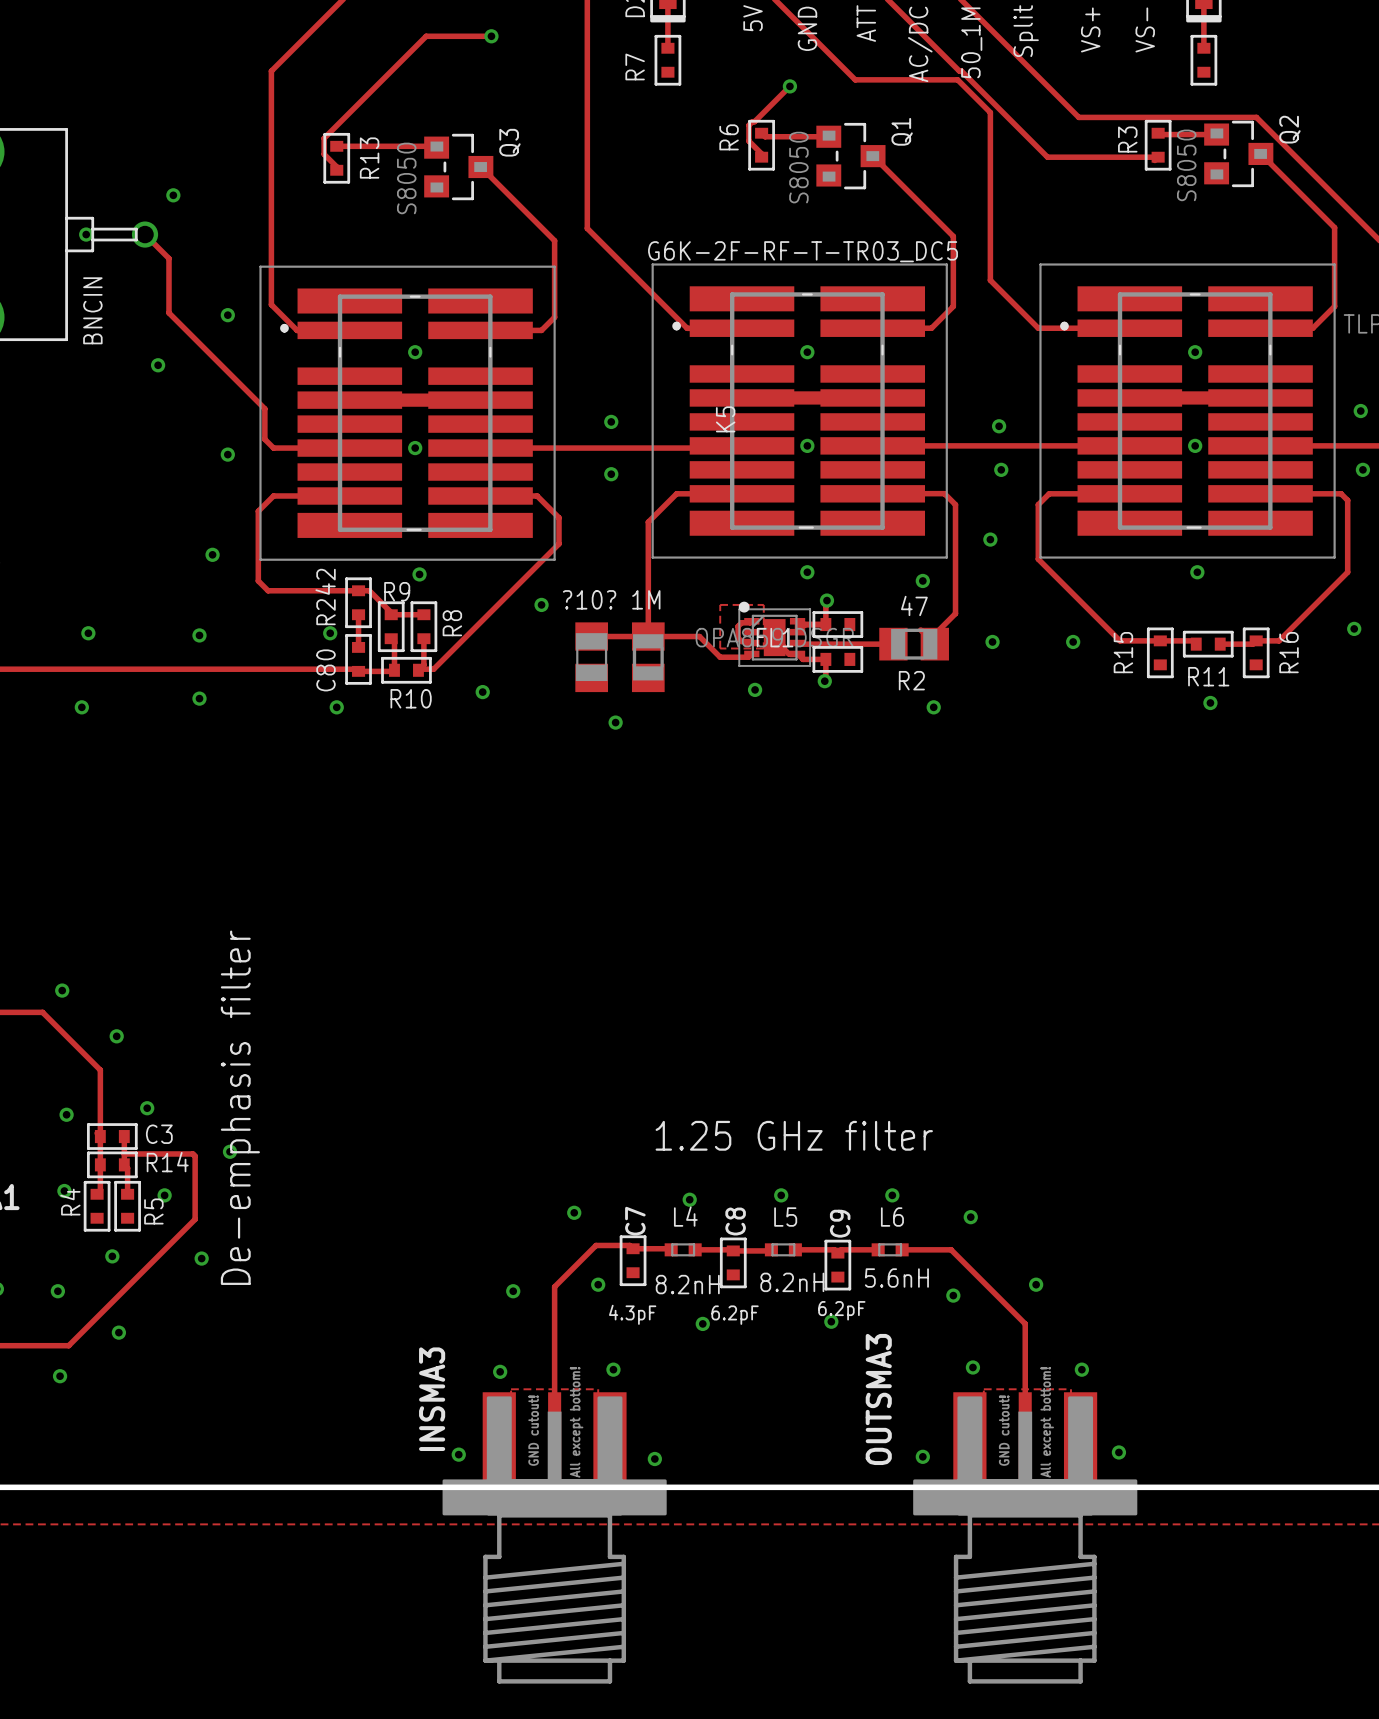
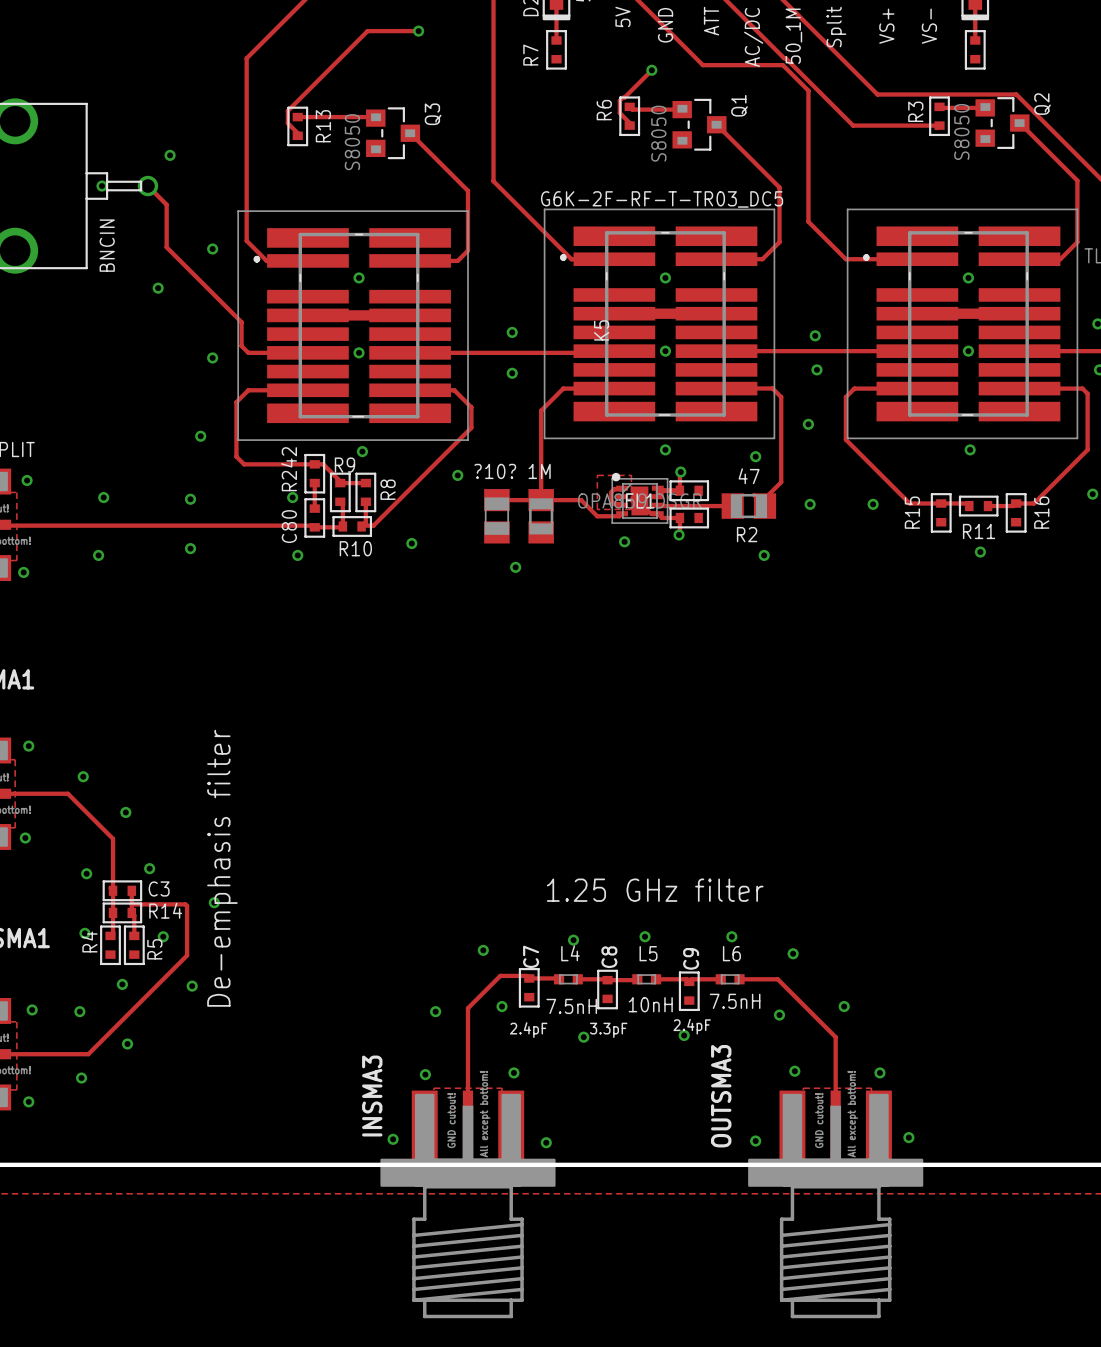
L6 value: 5.6nH (896, 1278) -> 7.5nH (735, 1001)
L5 value: 8.2nH (792, 1282) -> 10nH (650, 1004)
L4 value: 8.2nH (687, 1284) -> 7.5nH (571, 1006)
text: 6.2pF (841, 1310) -> 2.4pF (692, 1026)
text: 4.3pF (632, 1314) -> 2.4pF (528, 1030)
text: 6.2pF (735, 1315) -> 3.3pF (608, 1030)

